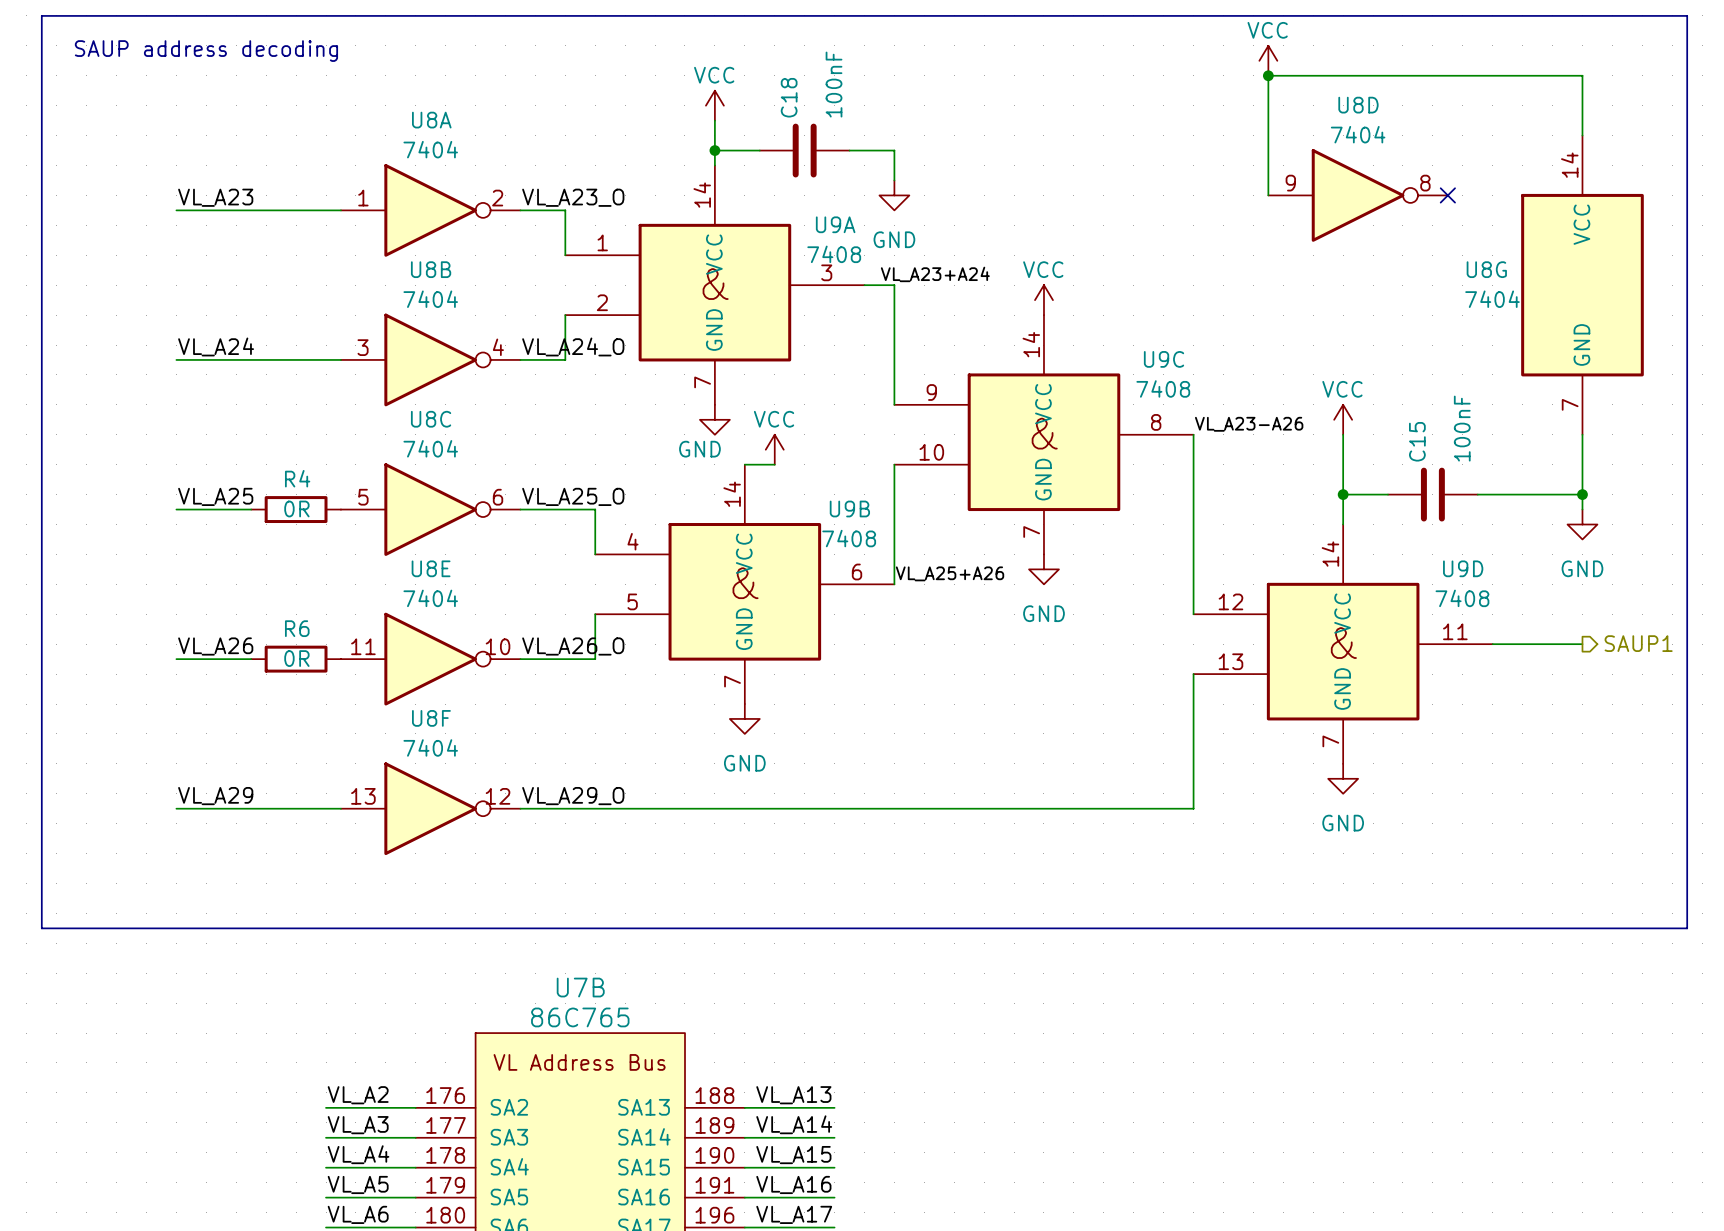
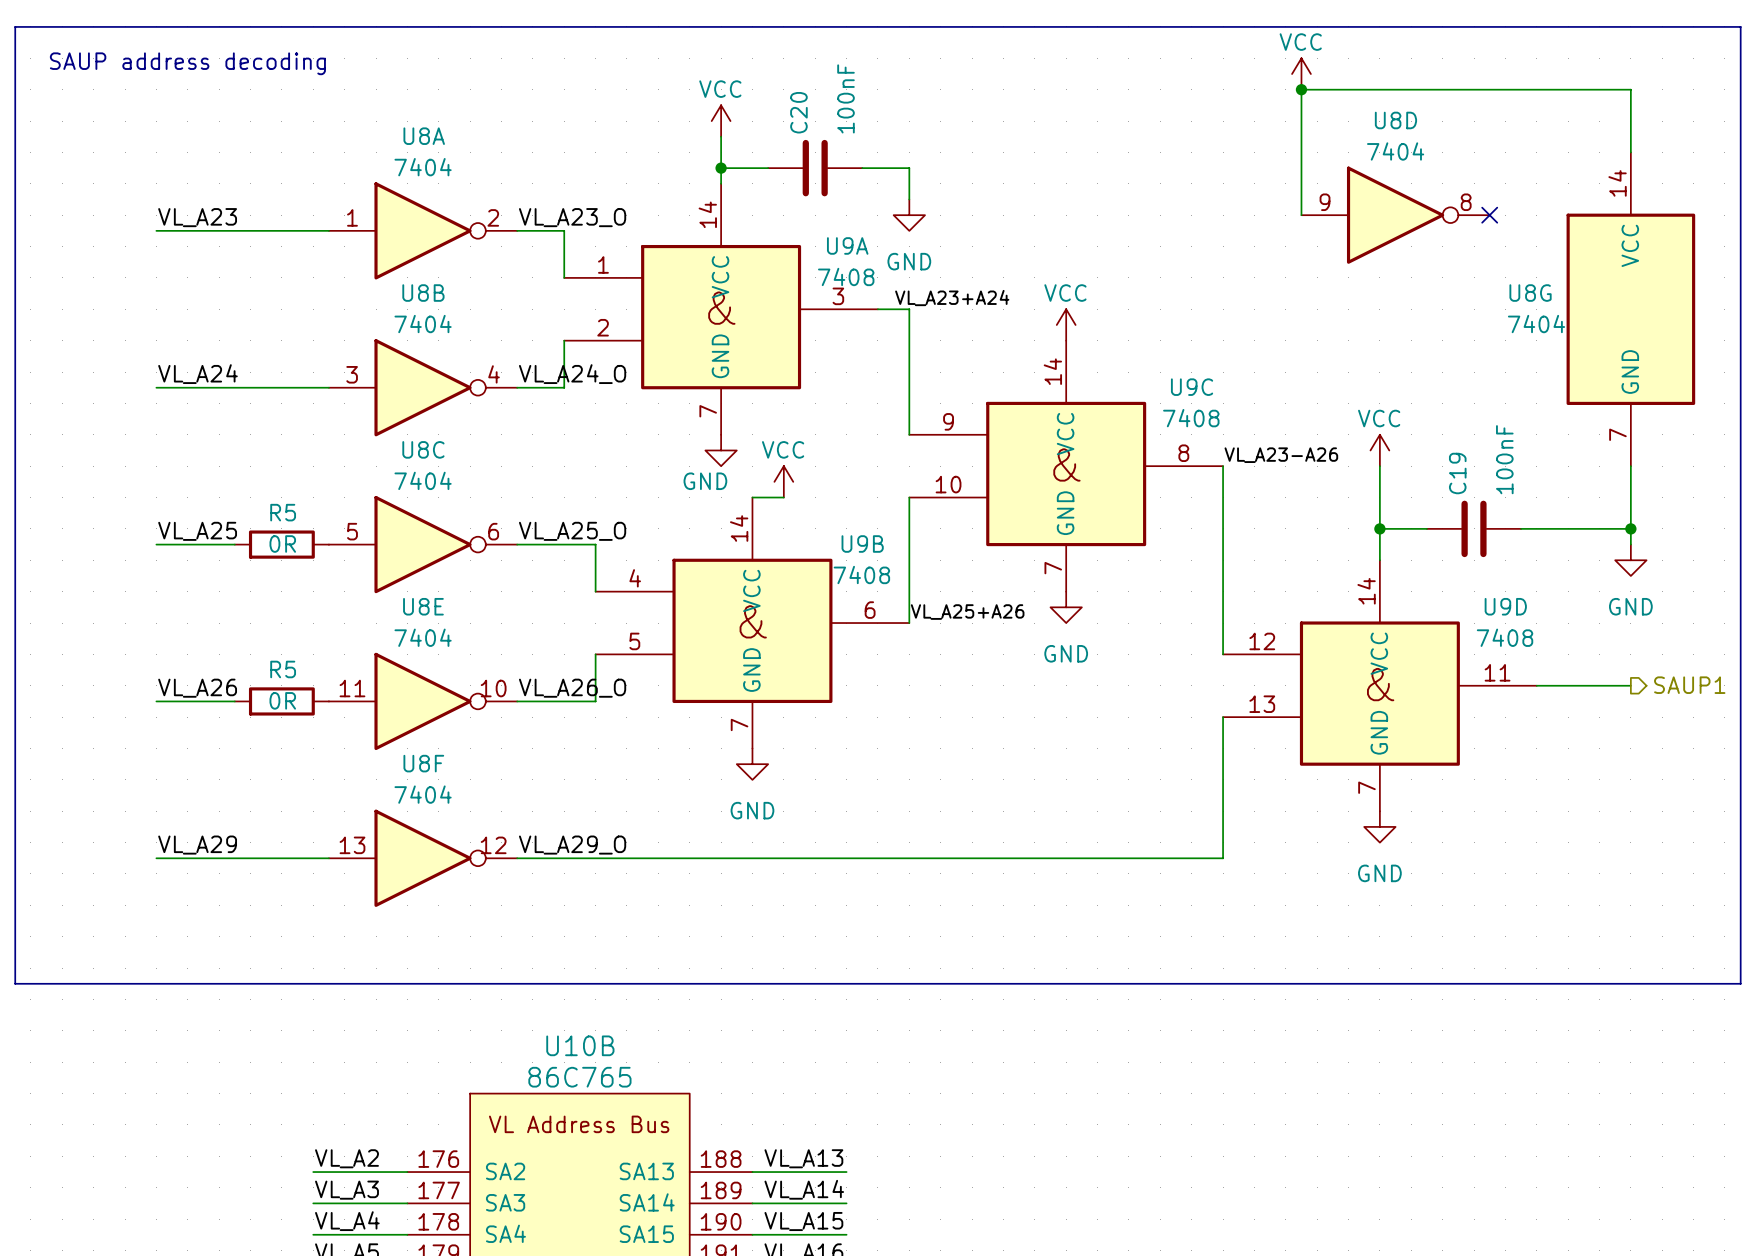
C18 name: C18 (789, 97) -> C20 (798, 112)
C15 name: C15 (1417, 441) -> C19 (1457, 473)
R4 name: R4 (297, 478) -> R5 (283, 512)
R6 name: R6 (297, 628) -> R5 (283, 669)
U7B name: U7B (580, 987) -> U10B (580, 1045)

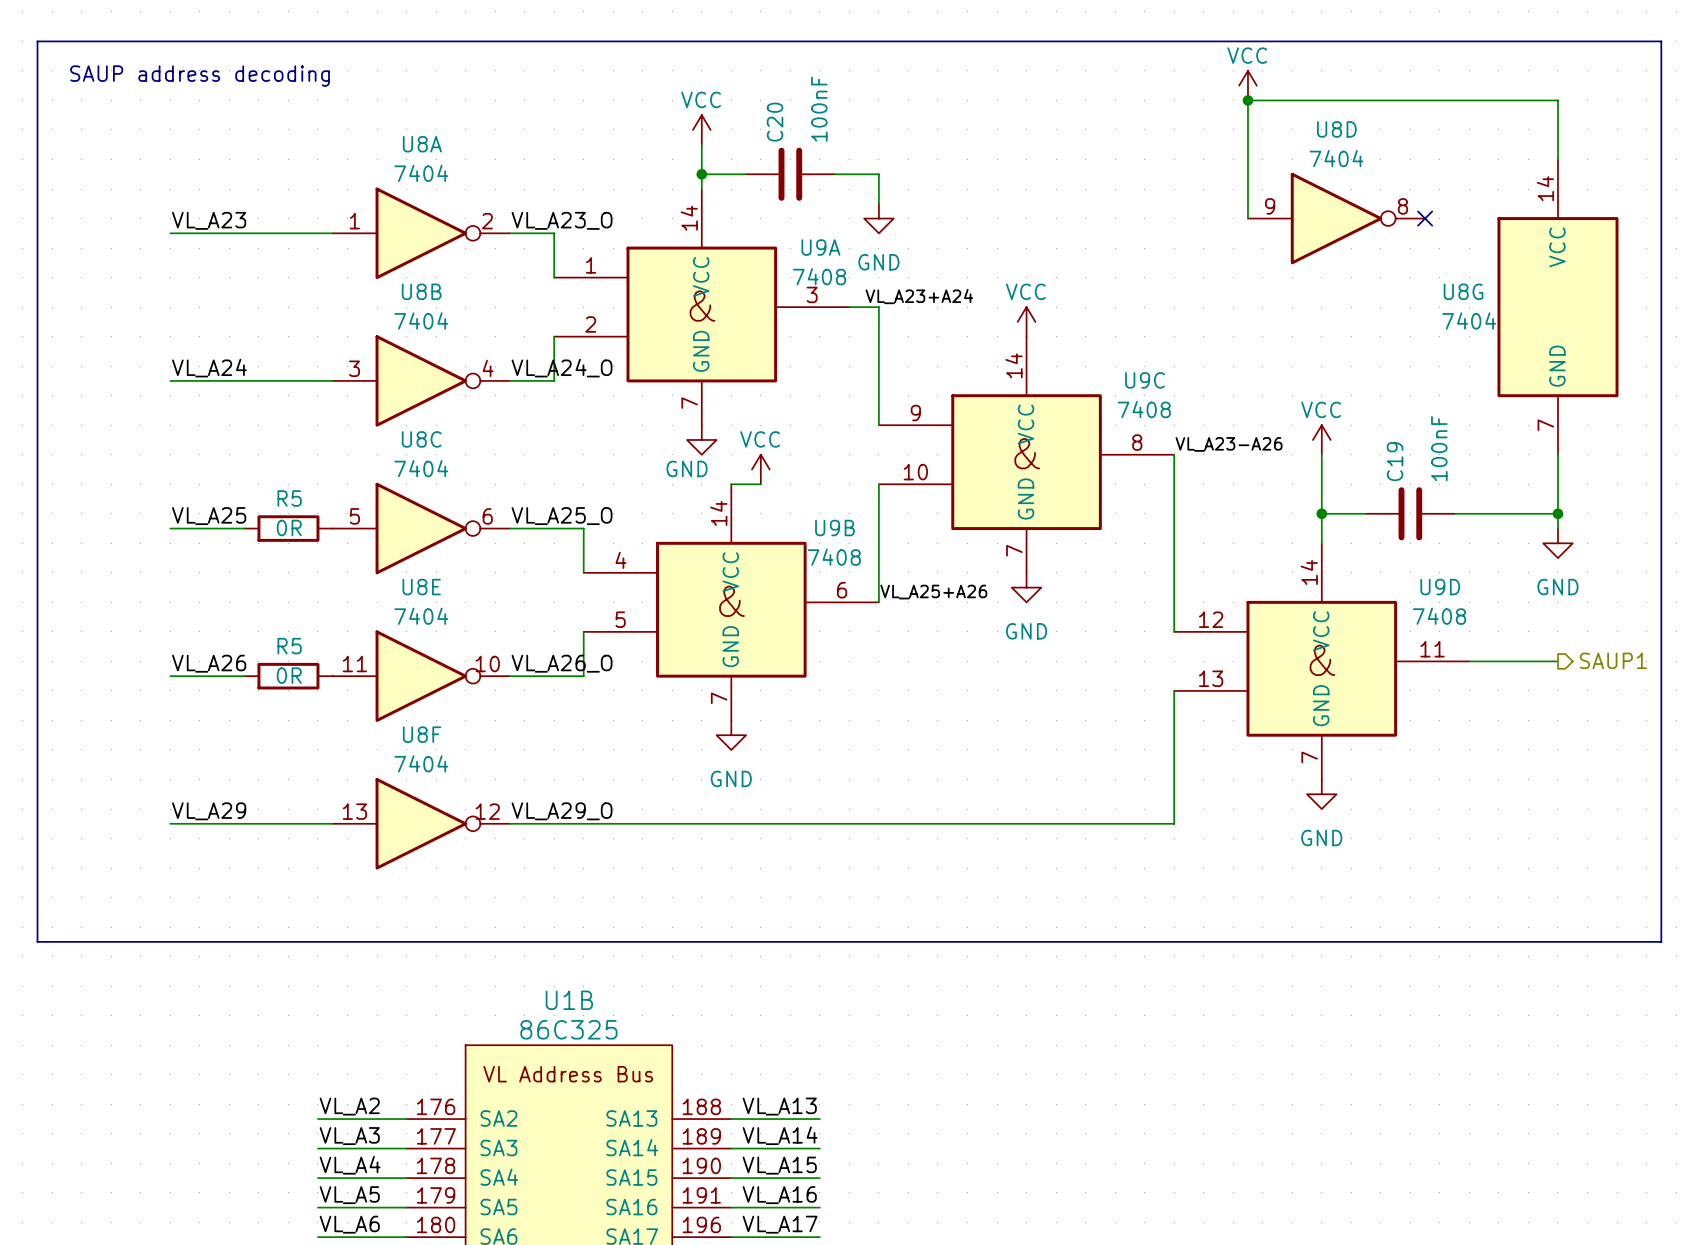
U10B name: U10B (580, 1045) -> U1B (569, 1000)
U10B value: 86C765 (579, 1077) -> 86C325 (568, 1029)

